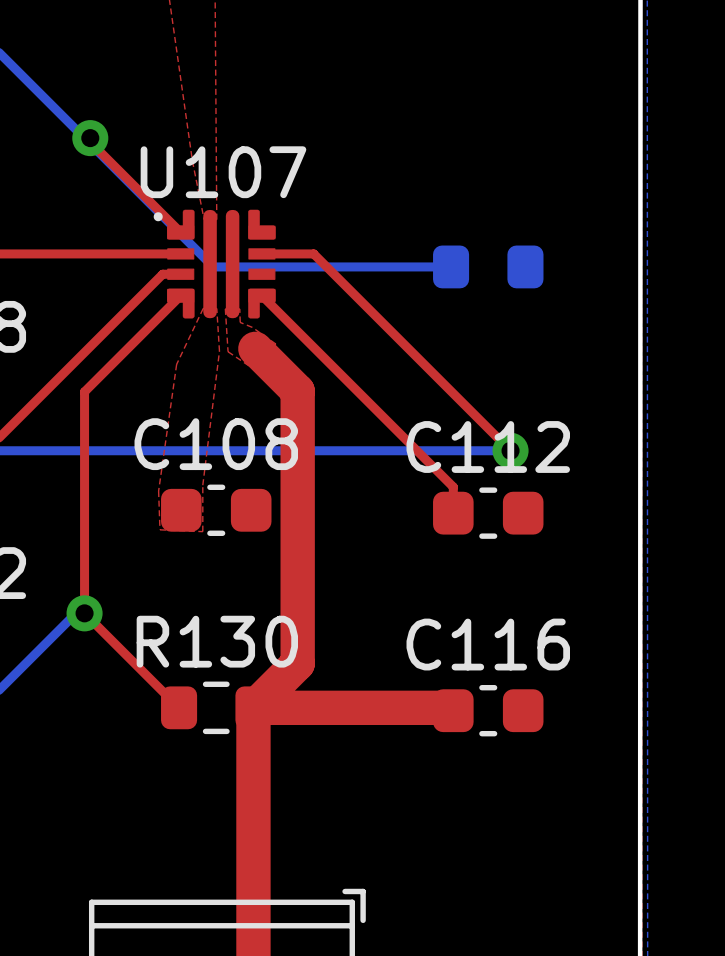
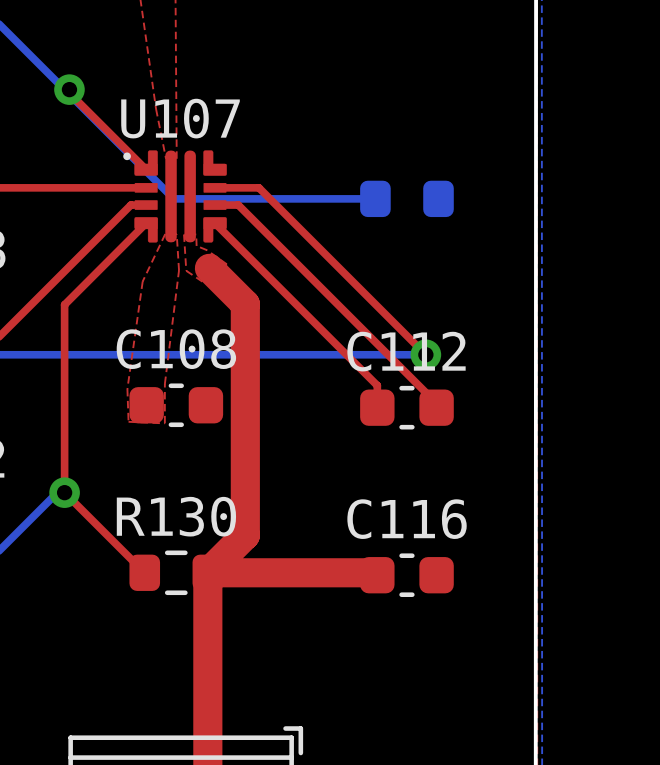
top track: none -> (215, 205) (238, 205) (438, 405)

